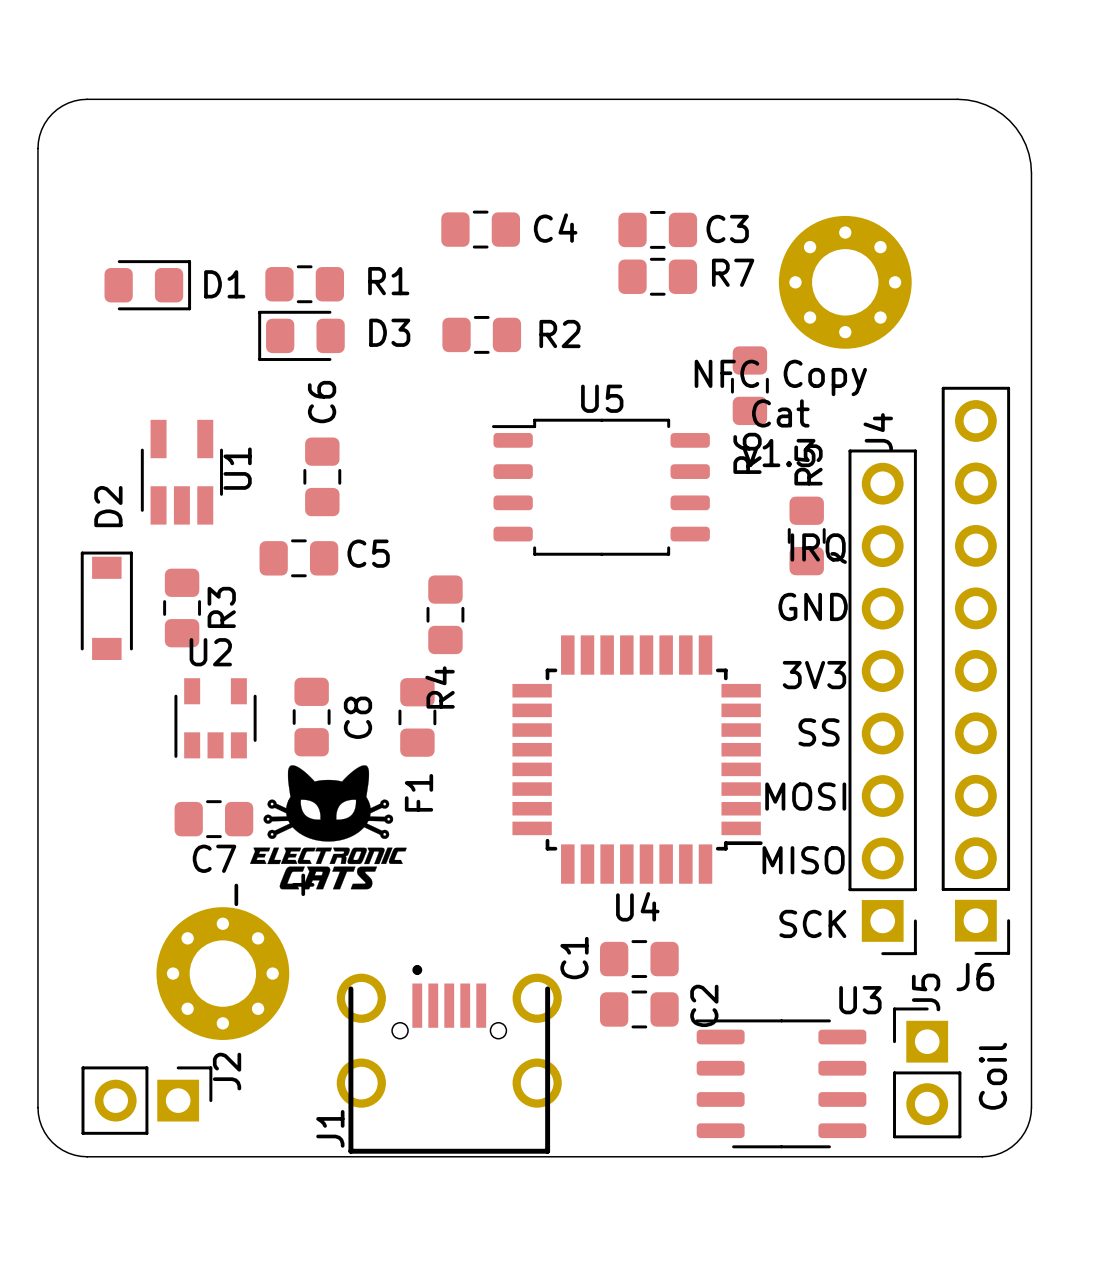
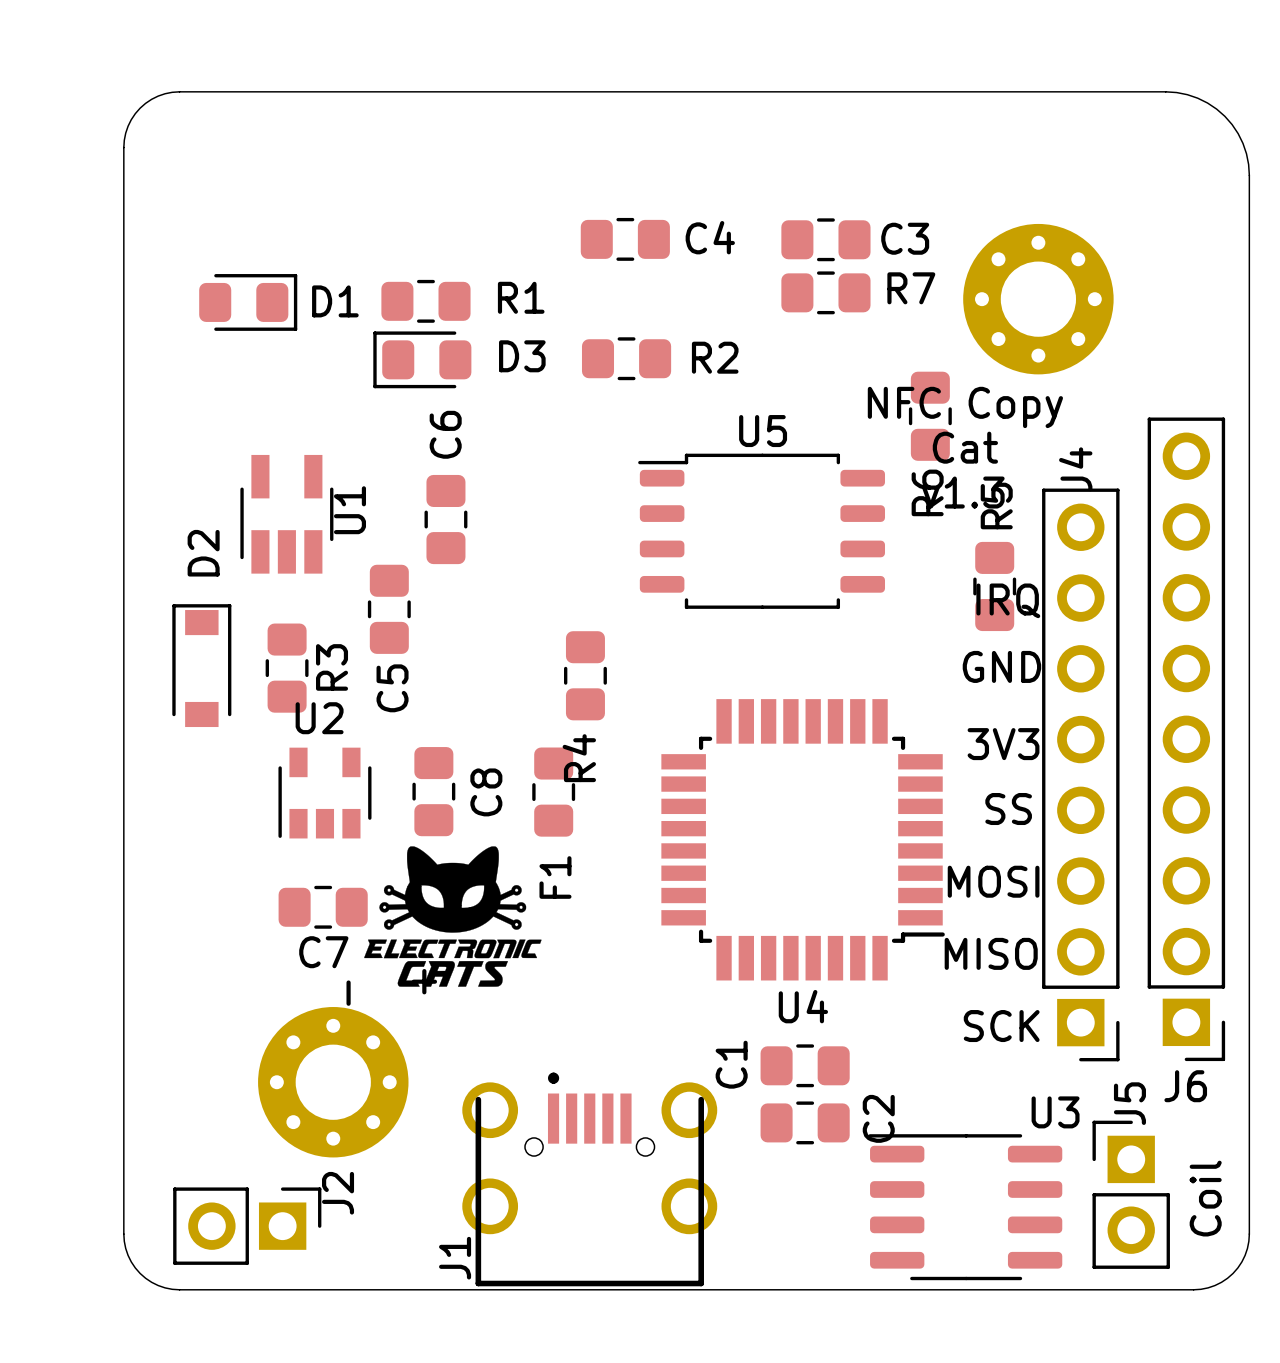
C5 rotation: 0° (298, 558) -> 90° clockwise (389, 609)

